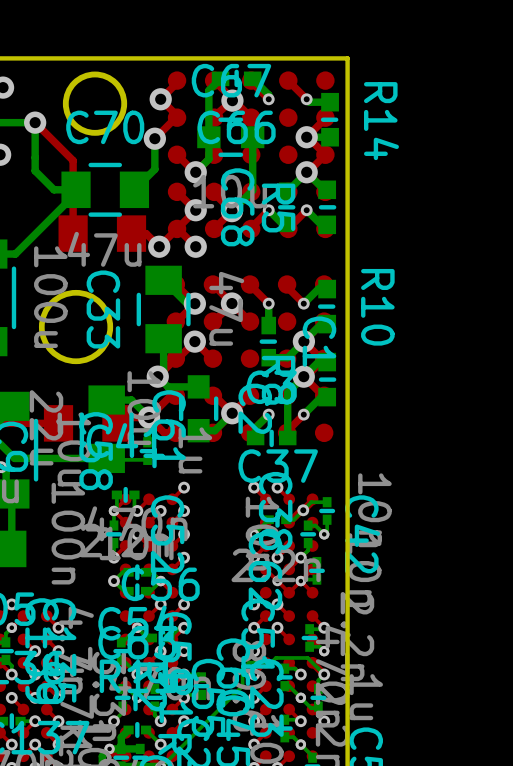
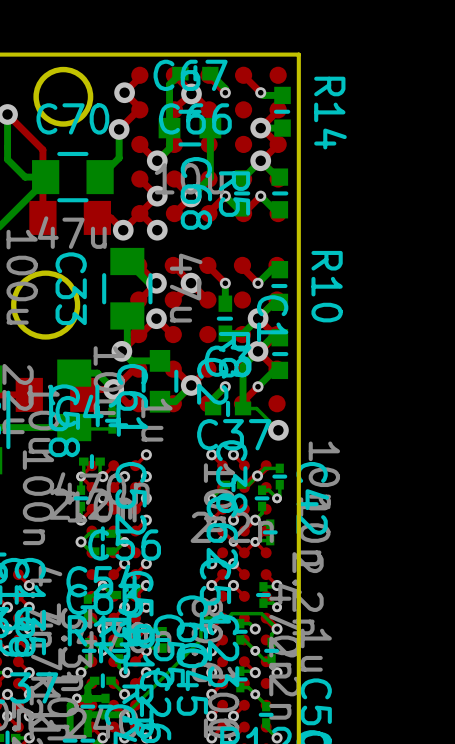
bottom track: none -> (243, 408) (256, 408) (278, 430)
via: none -> (278, 430)

